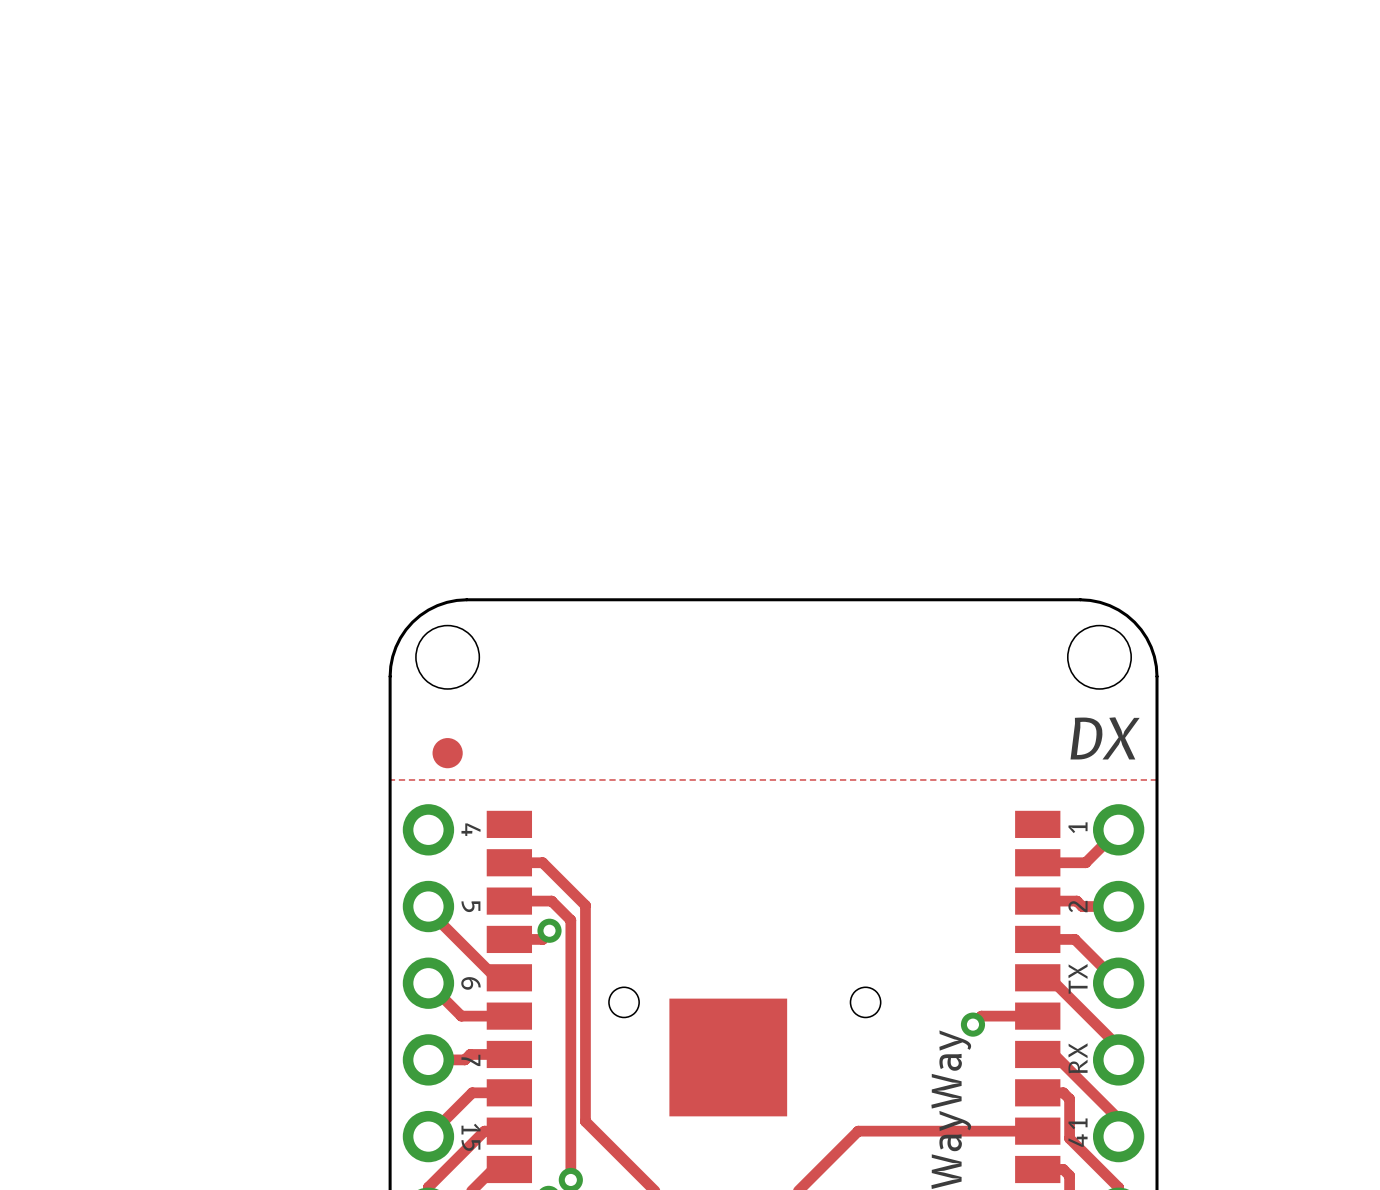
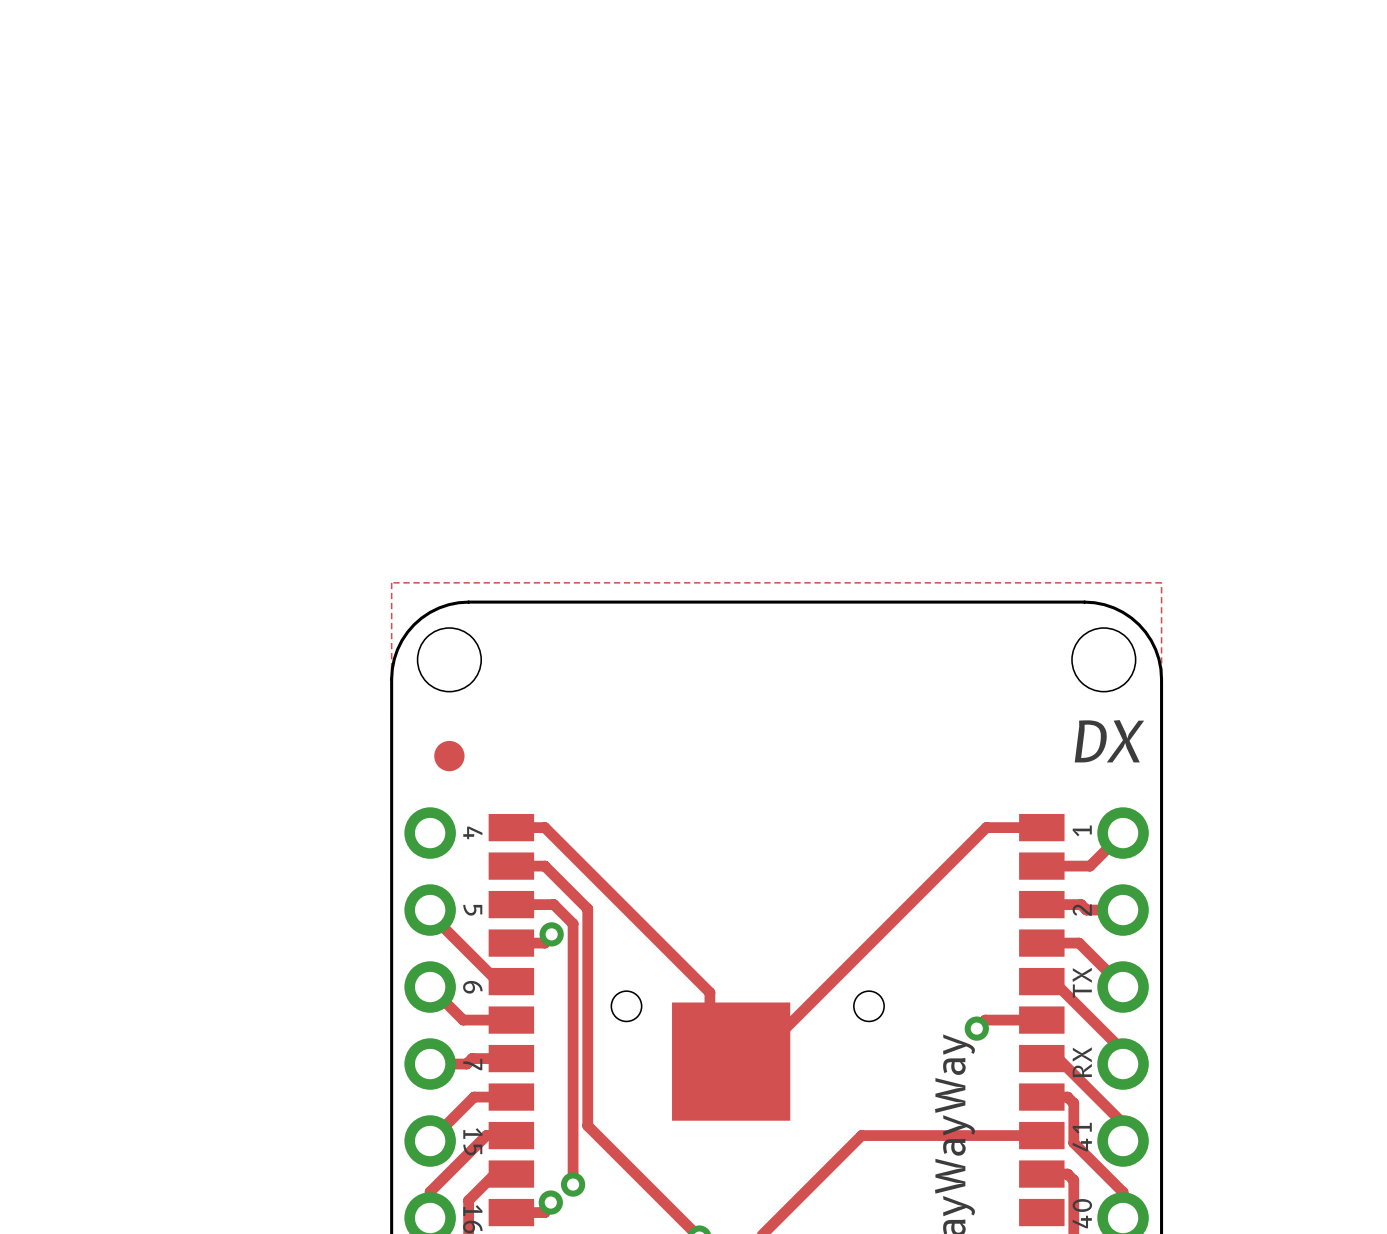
zone outline: (390, 779) (1157, 779) -> (391, 783) (391, 582) (1161, 582) (1161, 783)
track: none -> (511, 827) (544, 827) (709, 992) (709, 1019)
track: none -> (1041, 827) (986, 827) (773, 1040)

